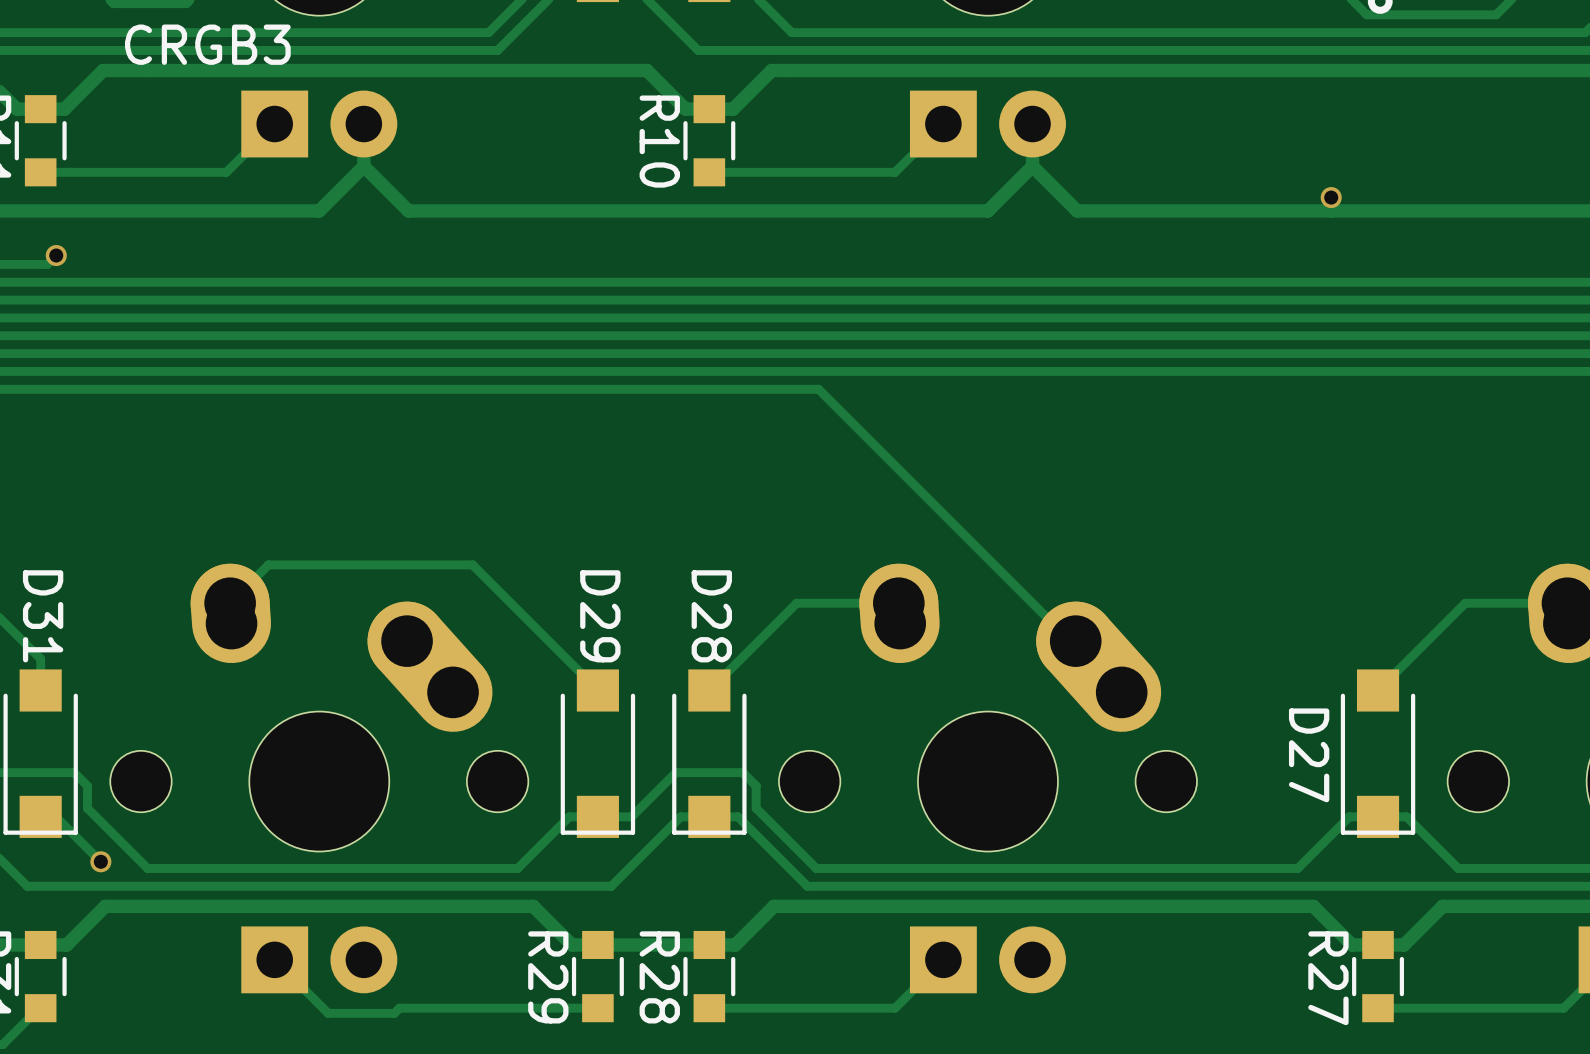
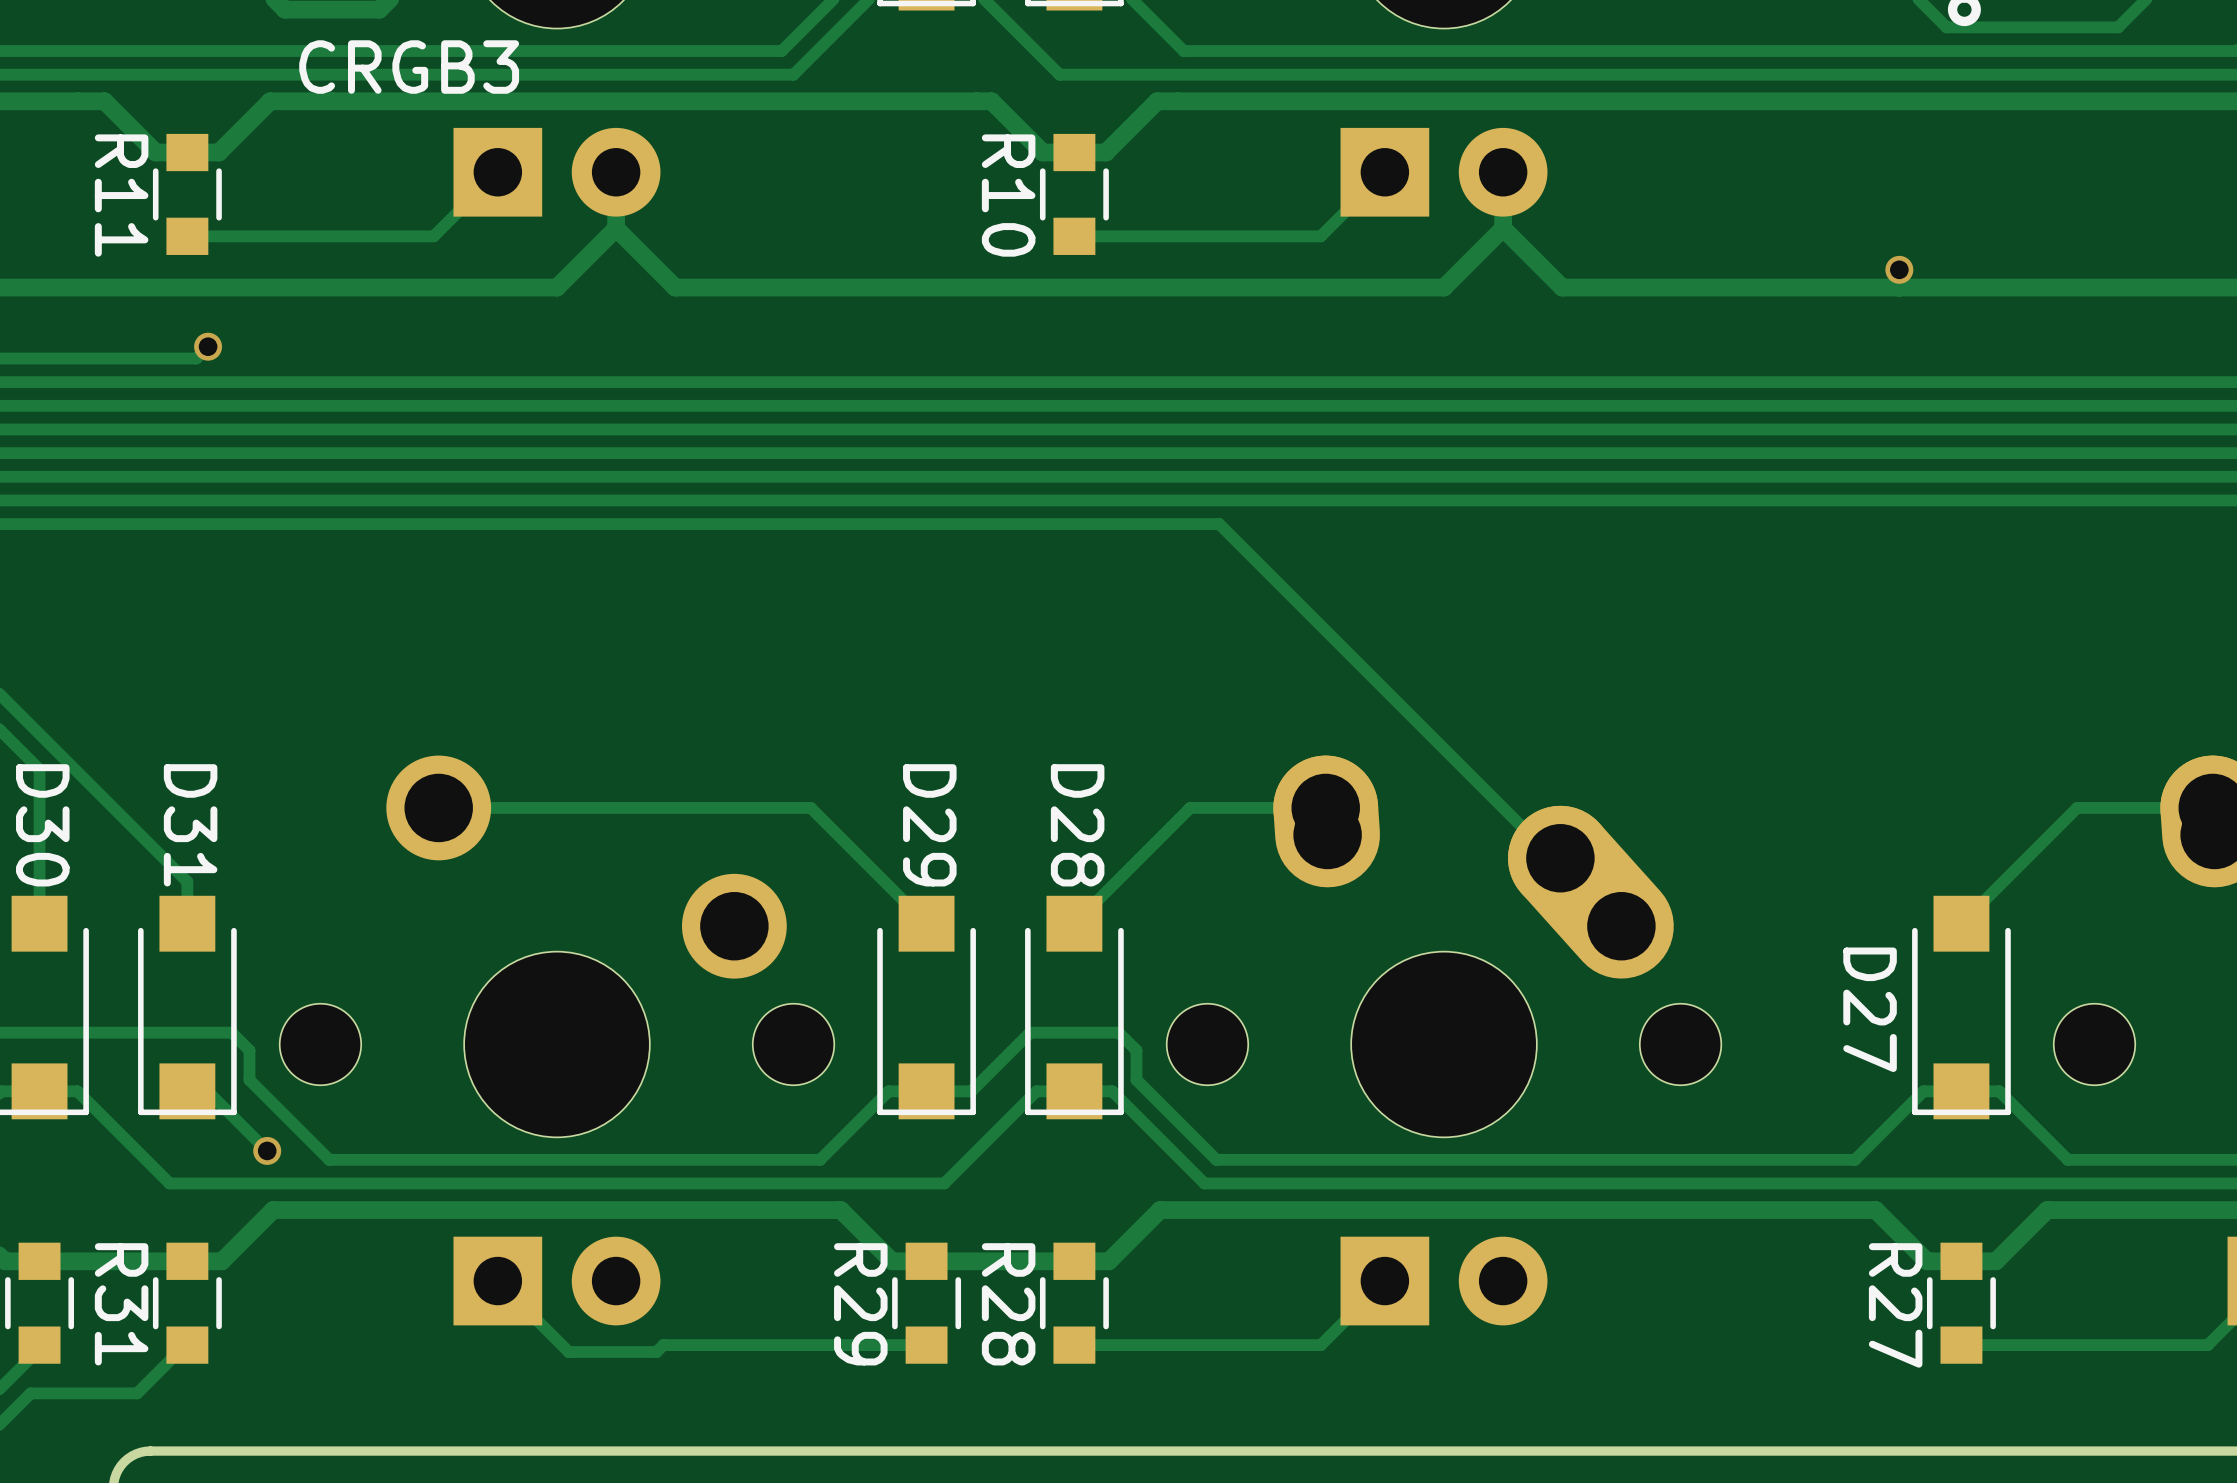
part footprint: [110, 563, 529, 994] -> [279, 755, 835, 1326]
track: (230, 603) (268, 564) (472, 564) (597, 690) -> (438, 807) (810, 807) (926, 923)

